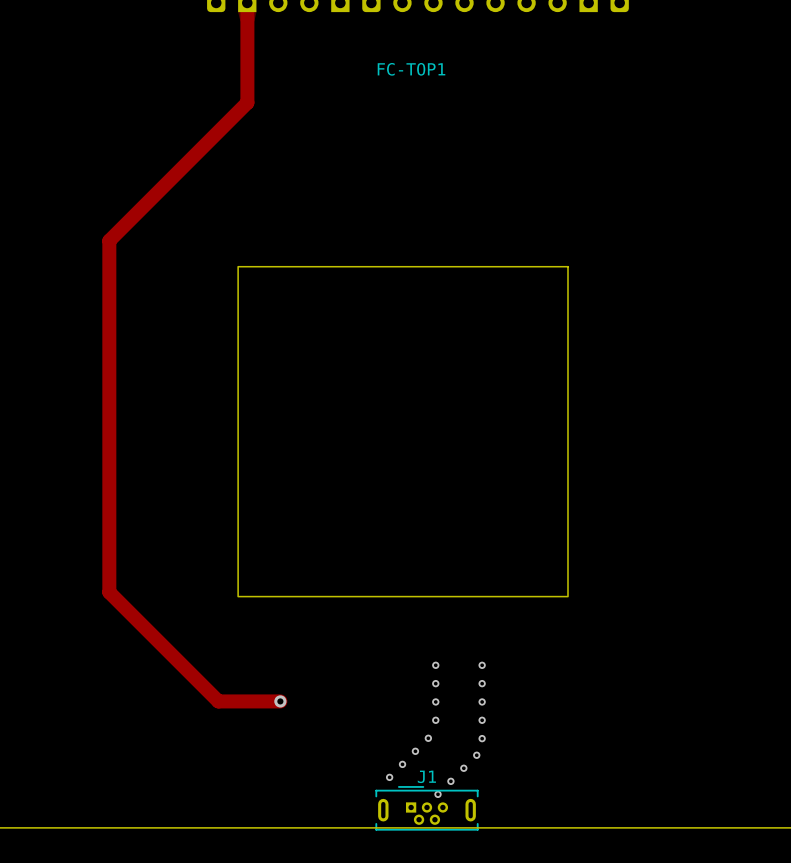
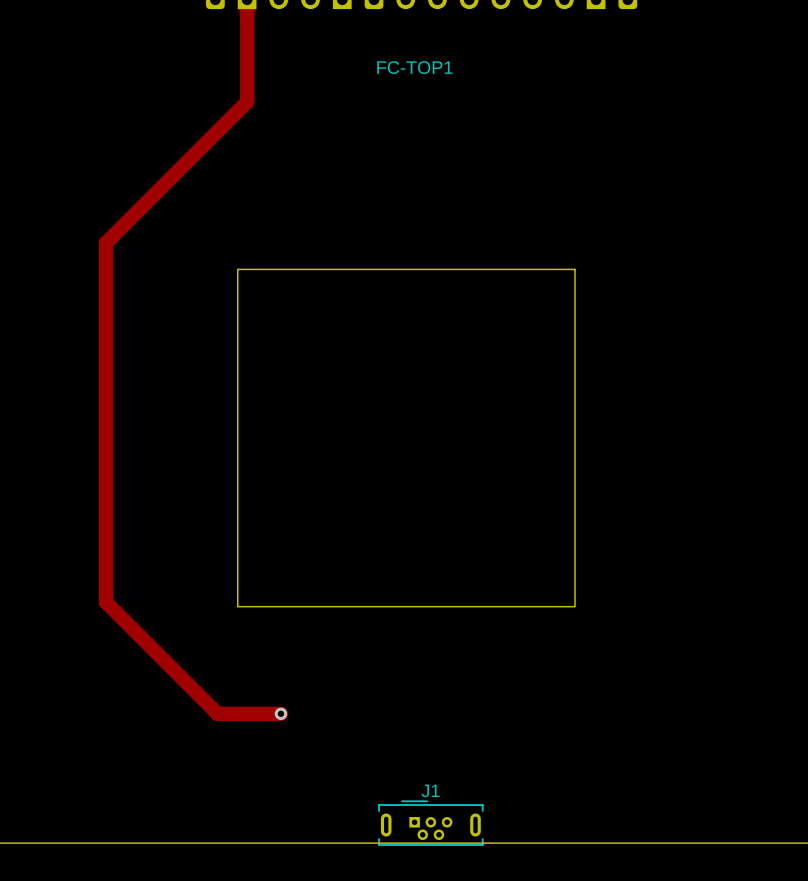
via: (435, 665) -> none
via: (482, 665) -> none
via: (435, 683) -> none
via: (482, 683) -> none
via: (435, 701) -> none
via: (482, 701) -> none
via: (435, 720) -> none
via: (482, 720) -> none
via: (428, 738) -> none
via: (482, 738) -> none
via: (415, 751) -> none
via: (476, 755) -> none
via: (402, 764) -> none
via: (463, 768) -> none
via: (389, 777) -> none
via: (450, 781) -> none
via: (438, 794) -> none

